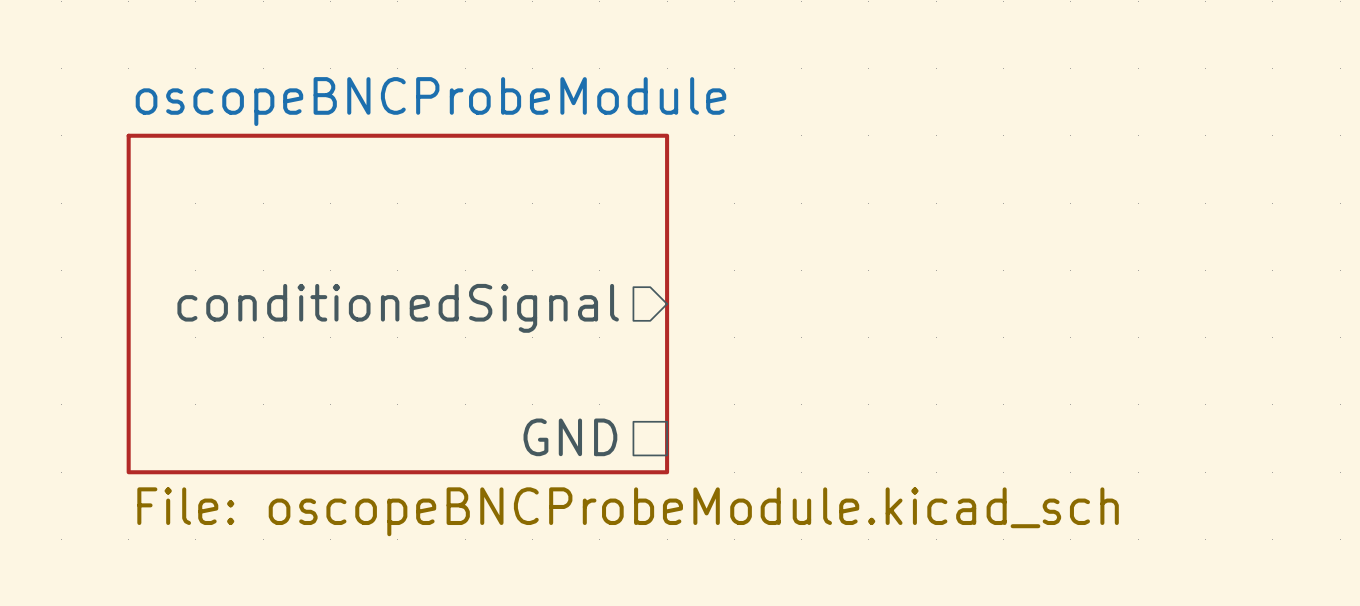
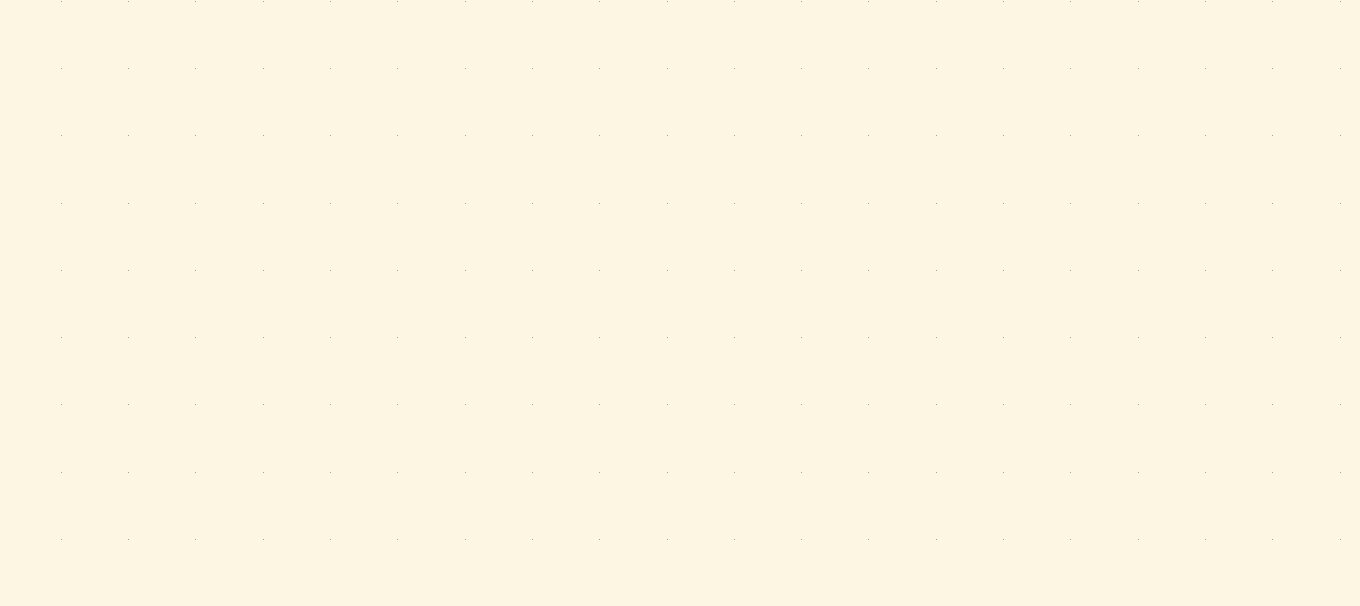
sheet oscopeBNCProbeModule: File: oscopeBNCProbeModule.kicad_sch (397, 304) -> none
sheet pin: conditionedSignal (398, 308) -> none
sheet pin: GND (570, 437) -> none

